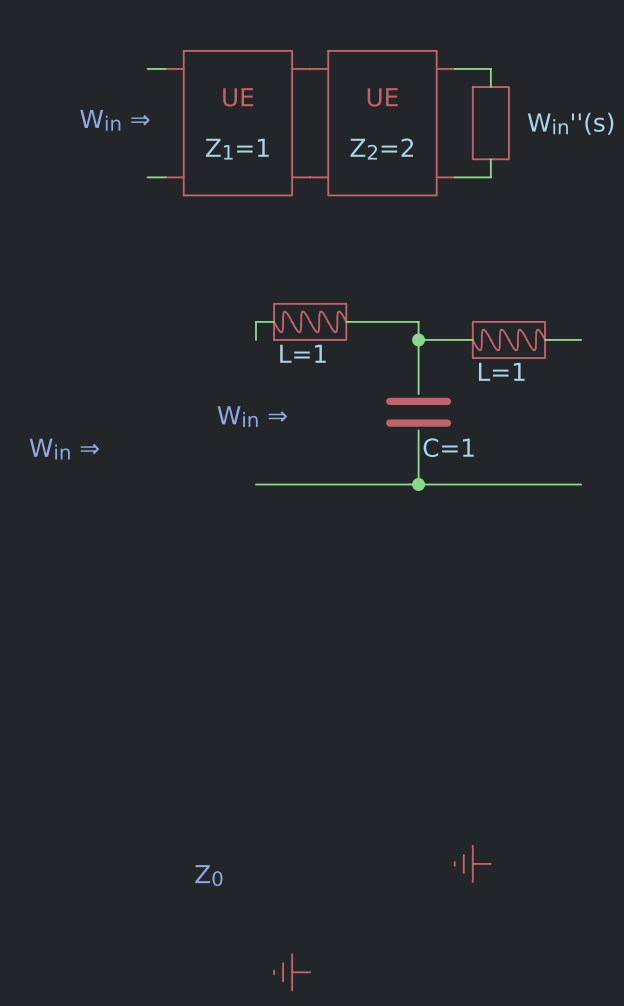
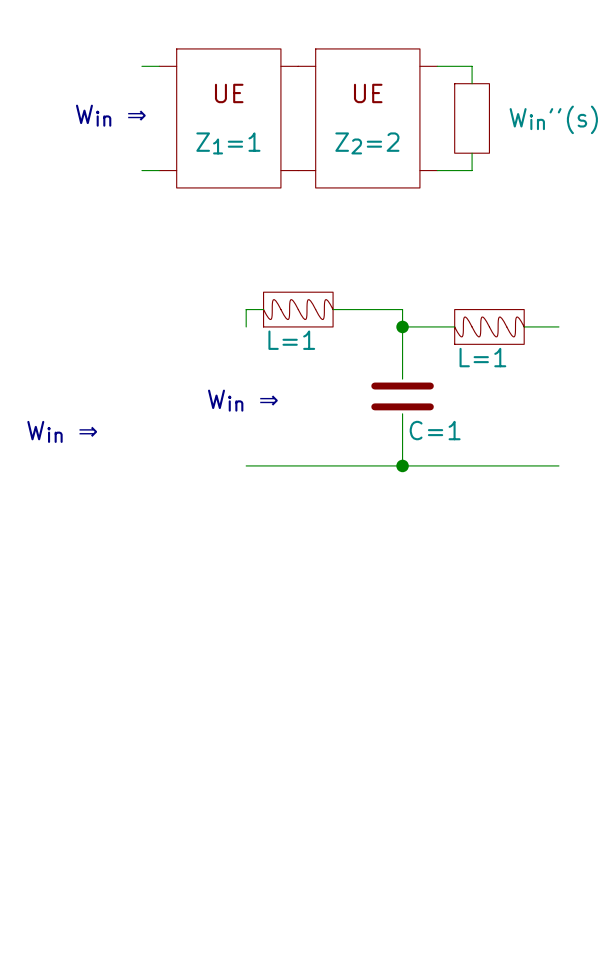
power symbol: (472, 863) -> none
text: Z0 (208, 875) -> none
power symbol: (292, 972) -> none

